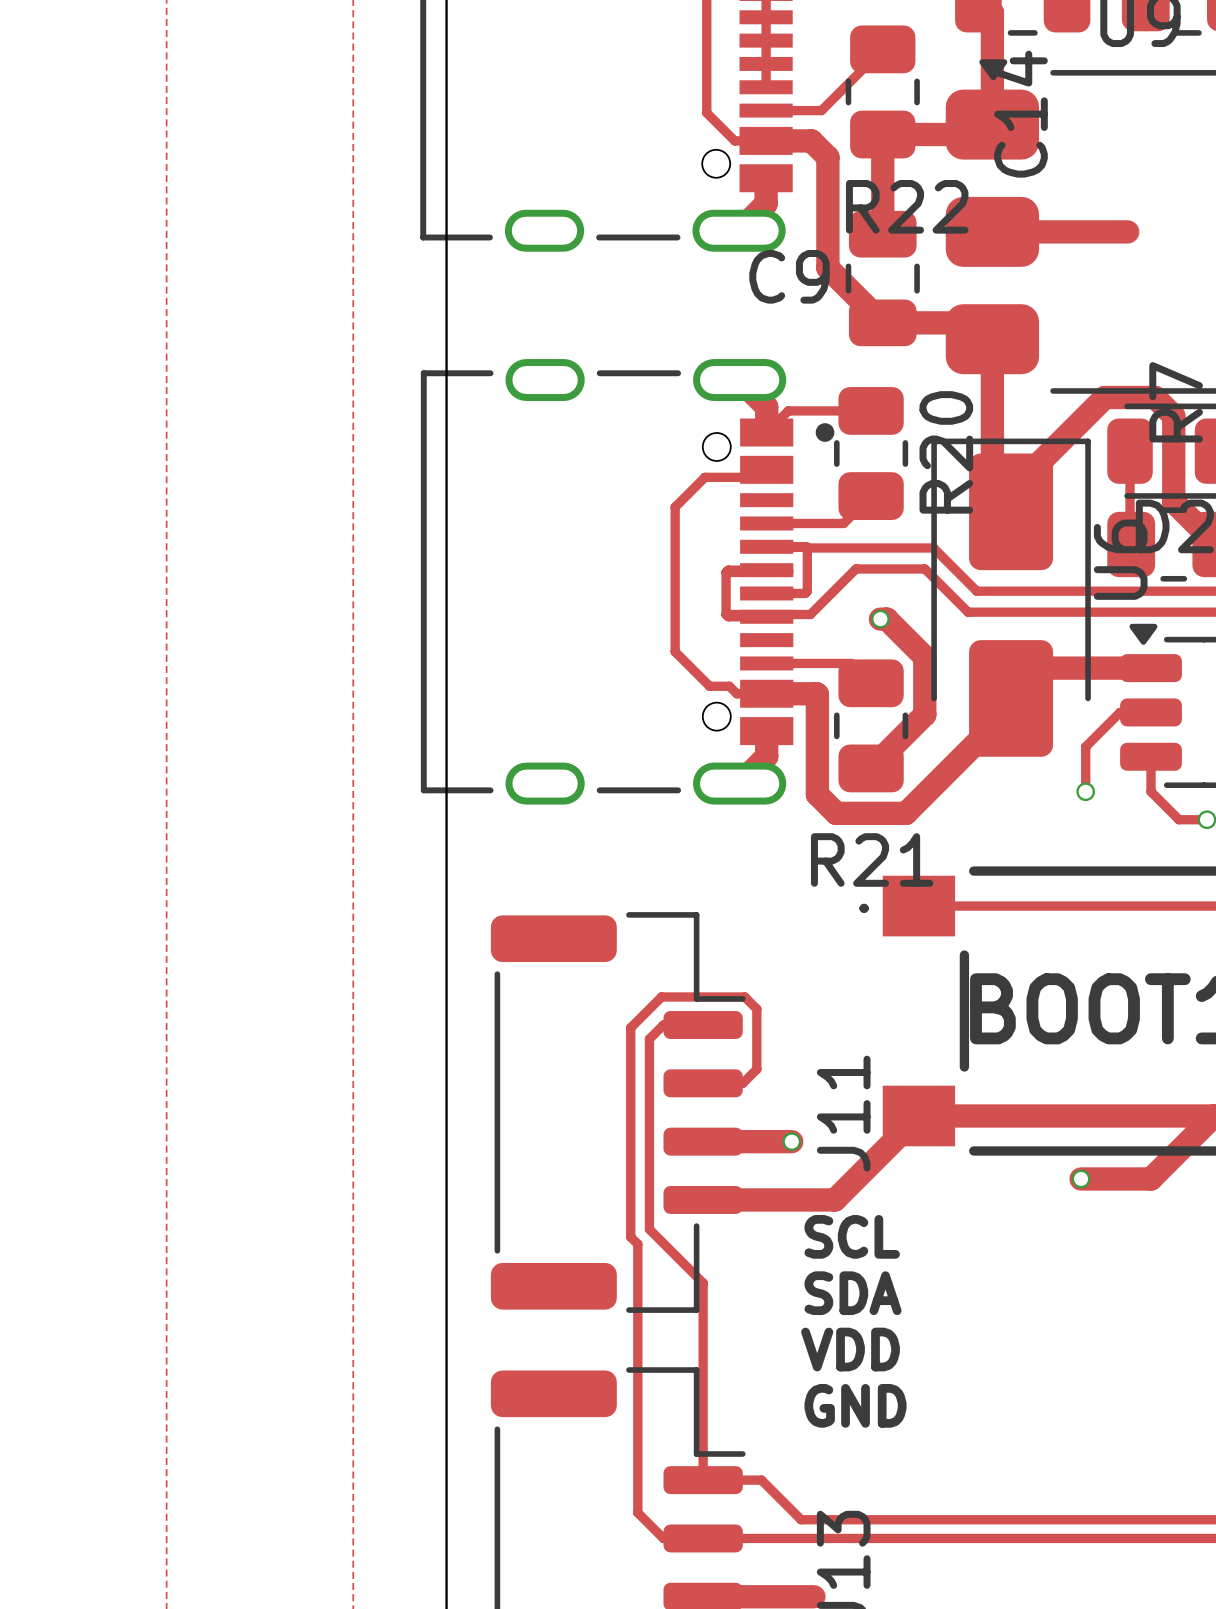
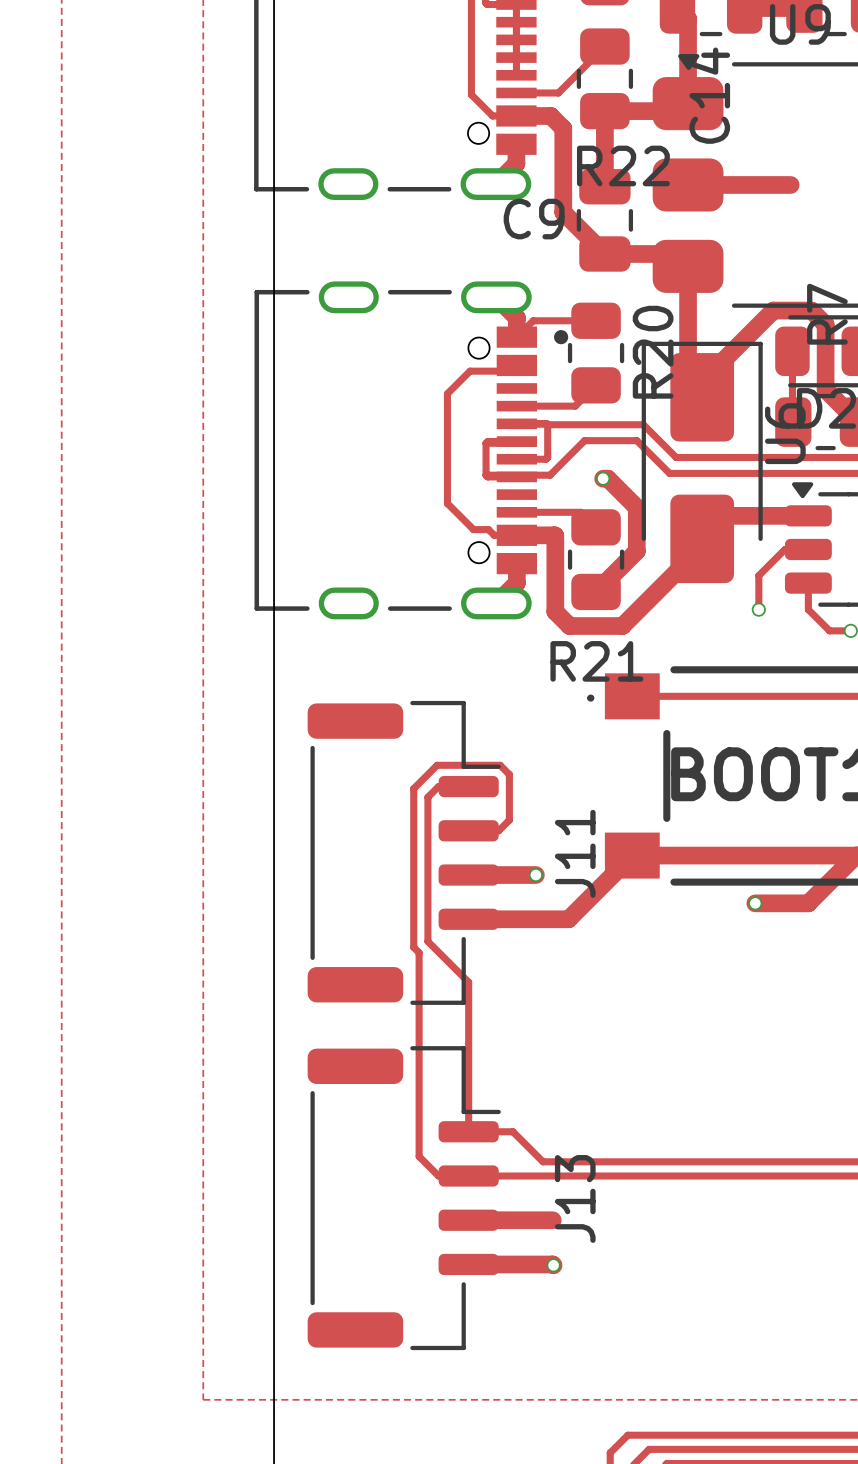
text: SCL (852, 1236) -> none
text: SDA (853, 1293) -> none
text: VDD (850, 1349) -> none
text: GND (855, 1405) -> none

